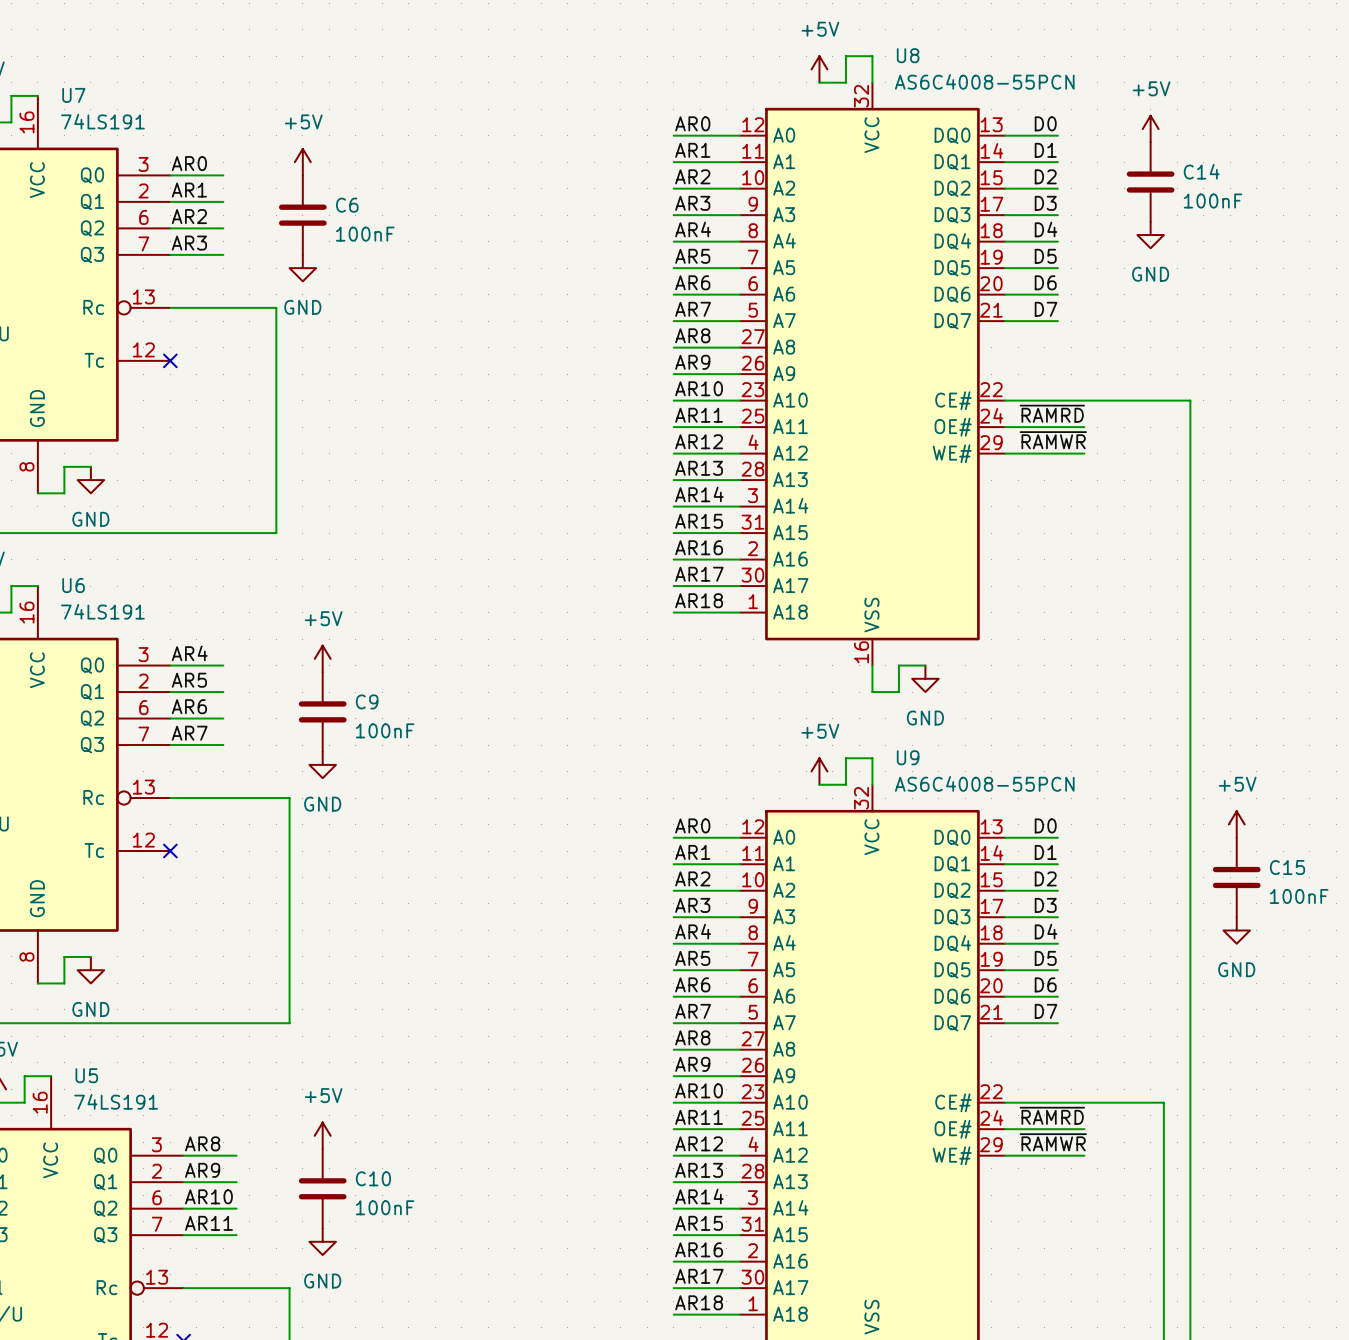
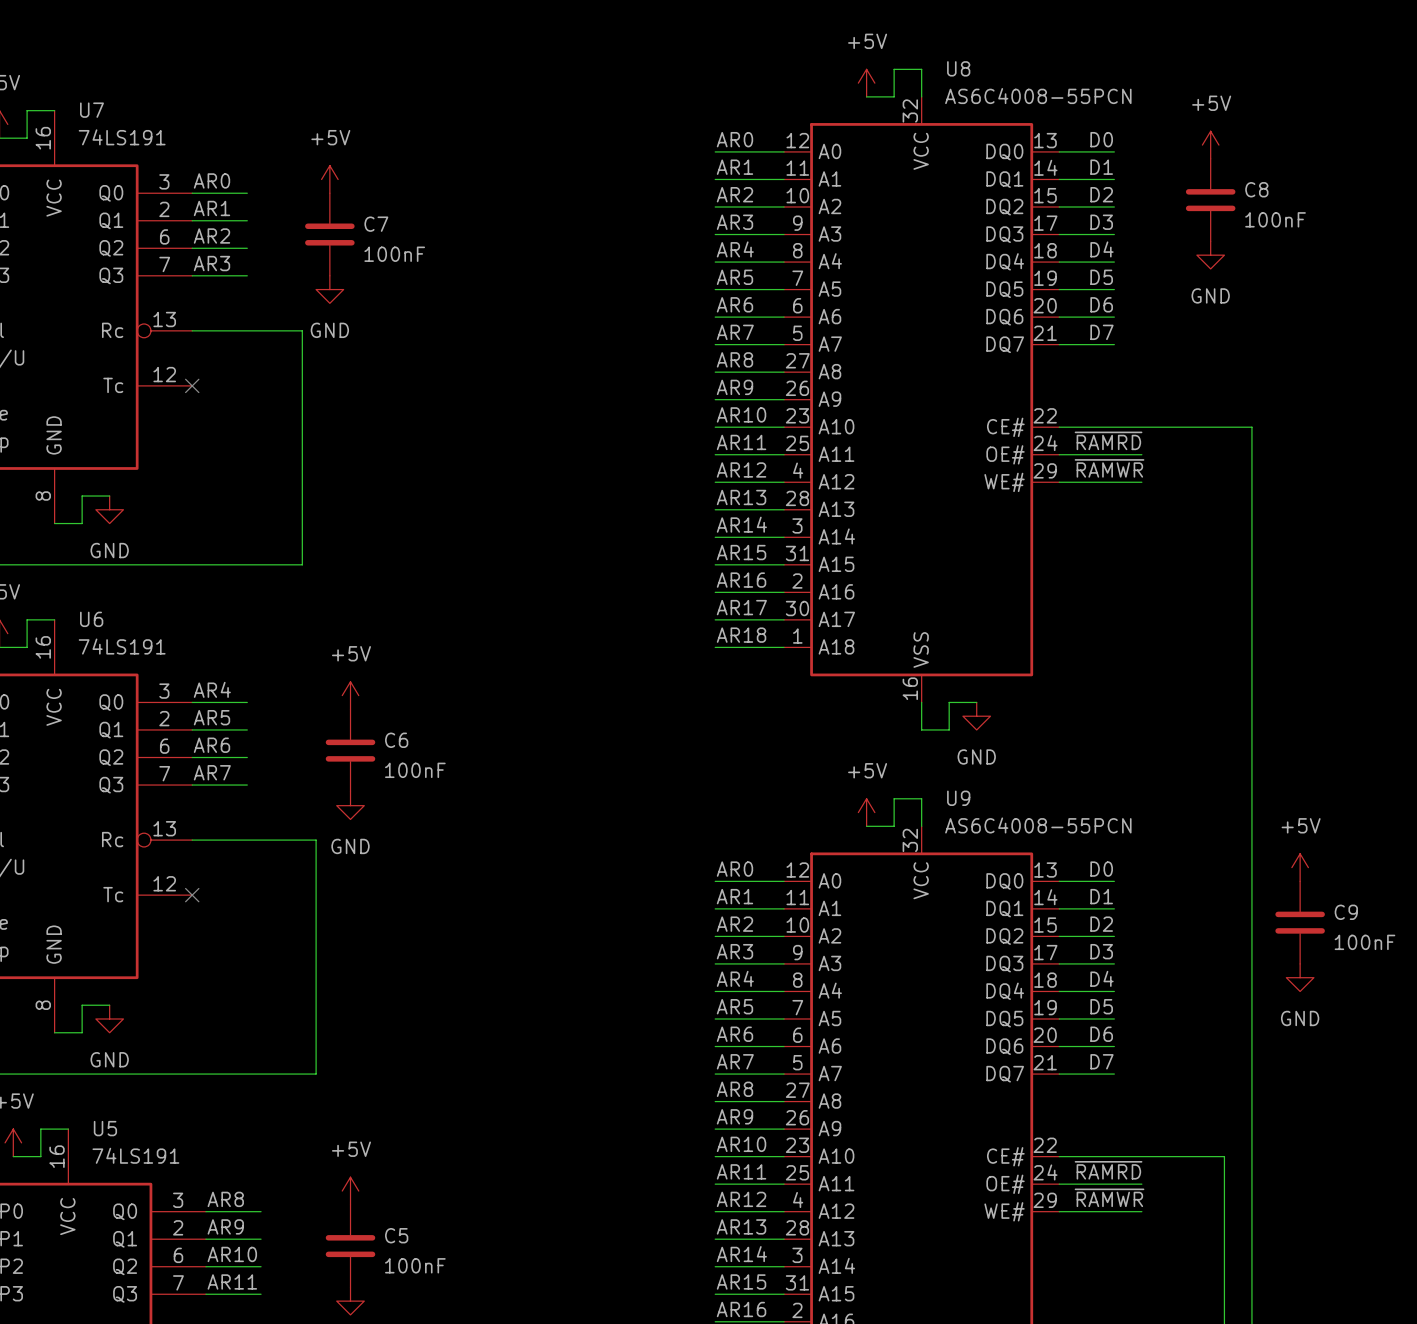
C14 name: C14 (1201, 171) -> C8 (1256, 189)
C6 name: C6 (347, 205) -> C7 (376, 224)
C9 name: C9 (367, 701) -> C6 (396, 740)
C15 name: C15 (1287, 867) -> C9 (1346, 912)
C10 name: C10 (373, 1178) -> C5 (396, 1235)

